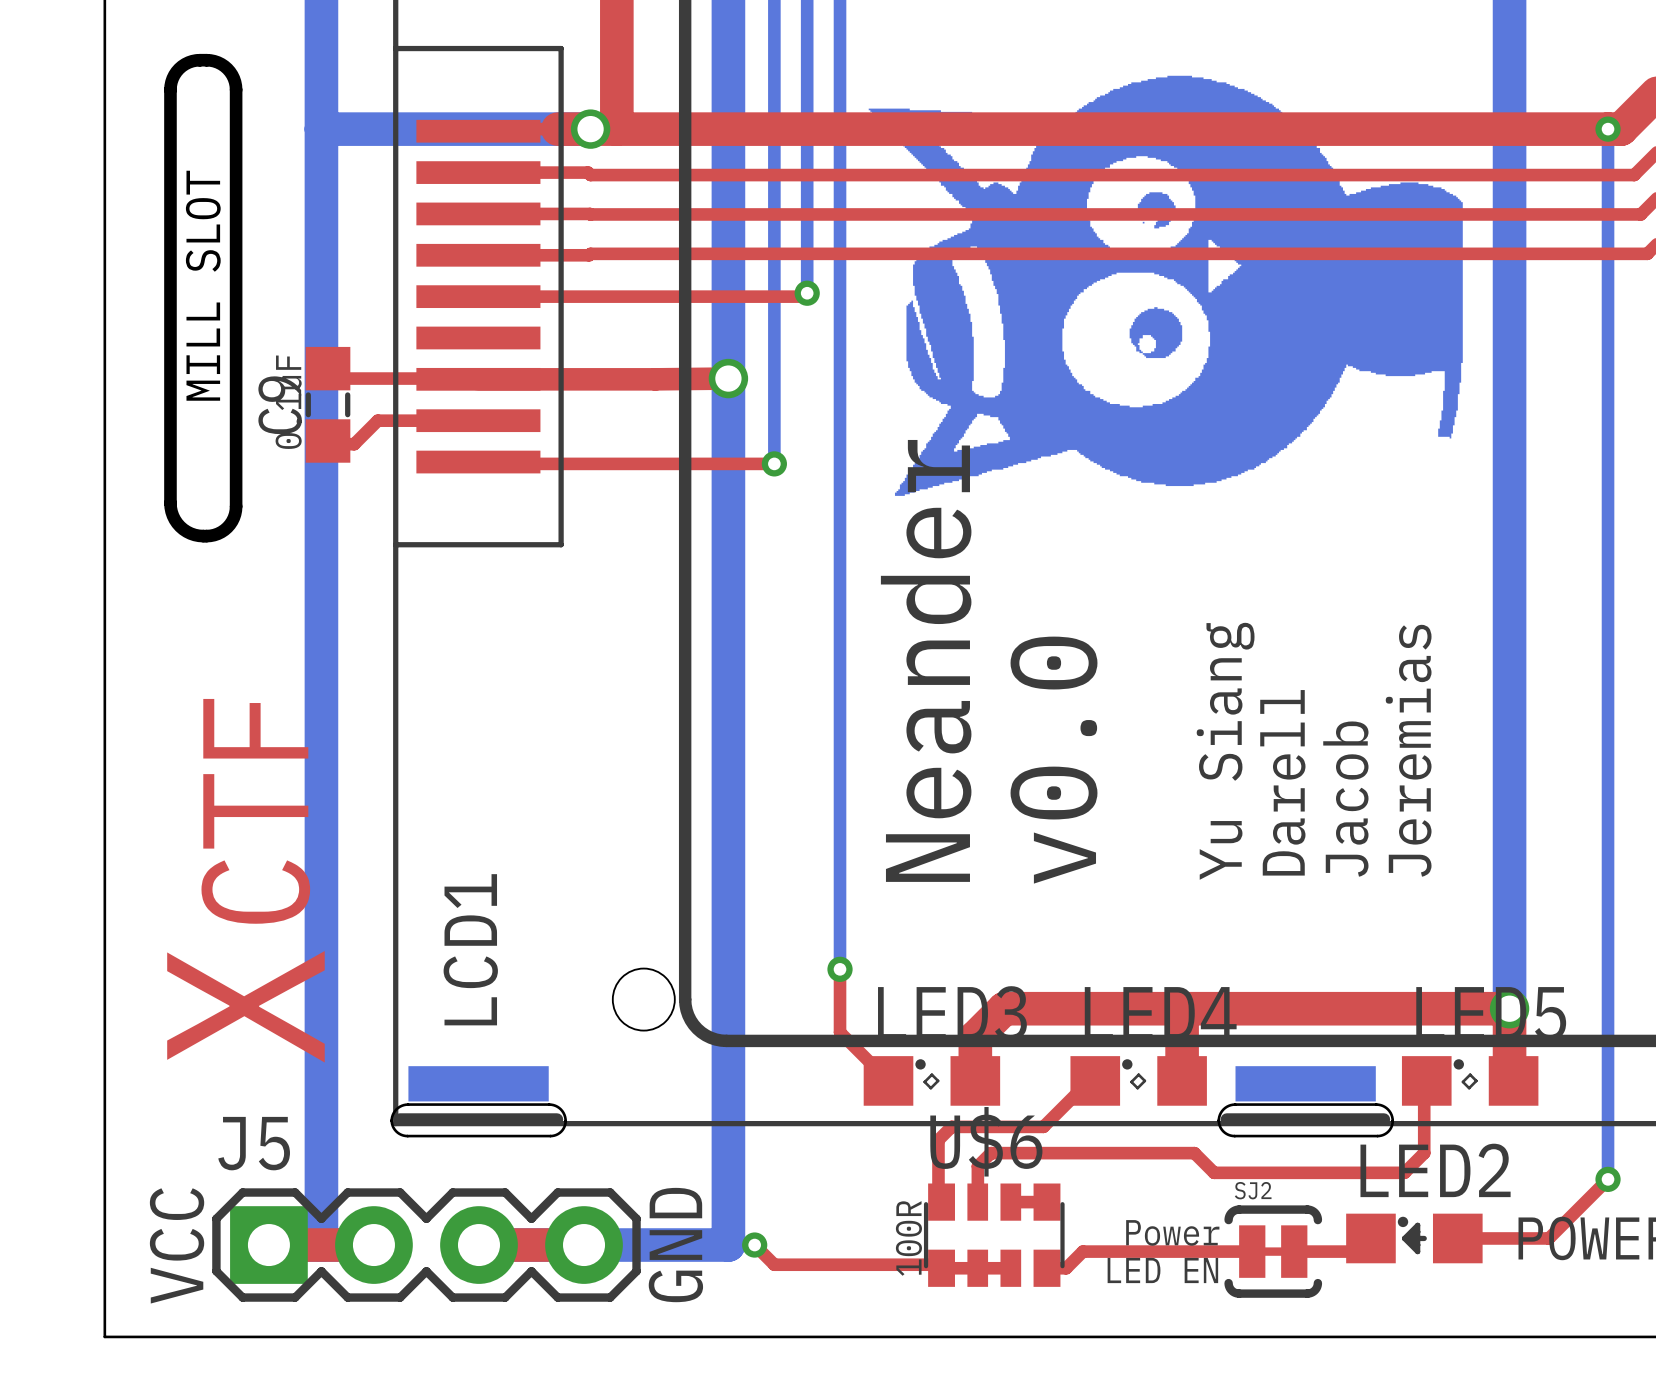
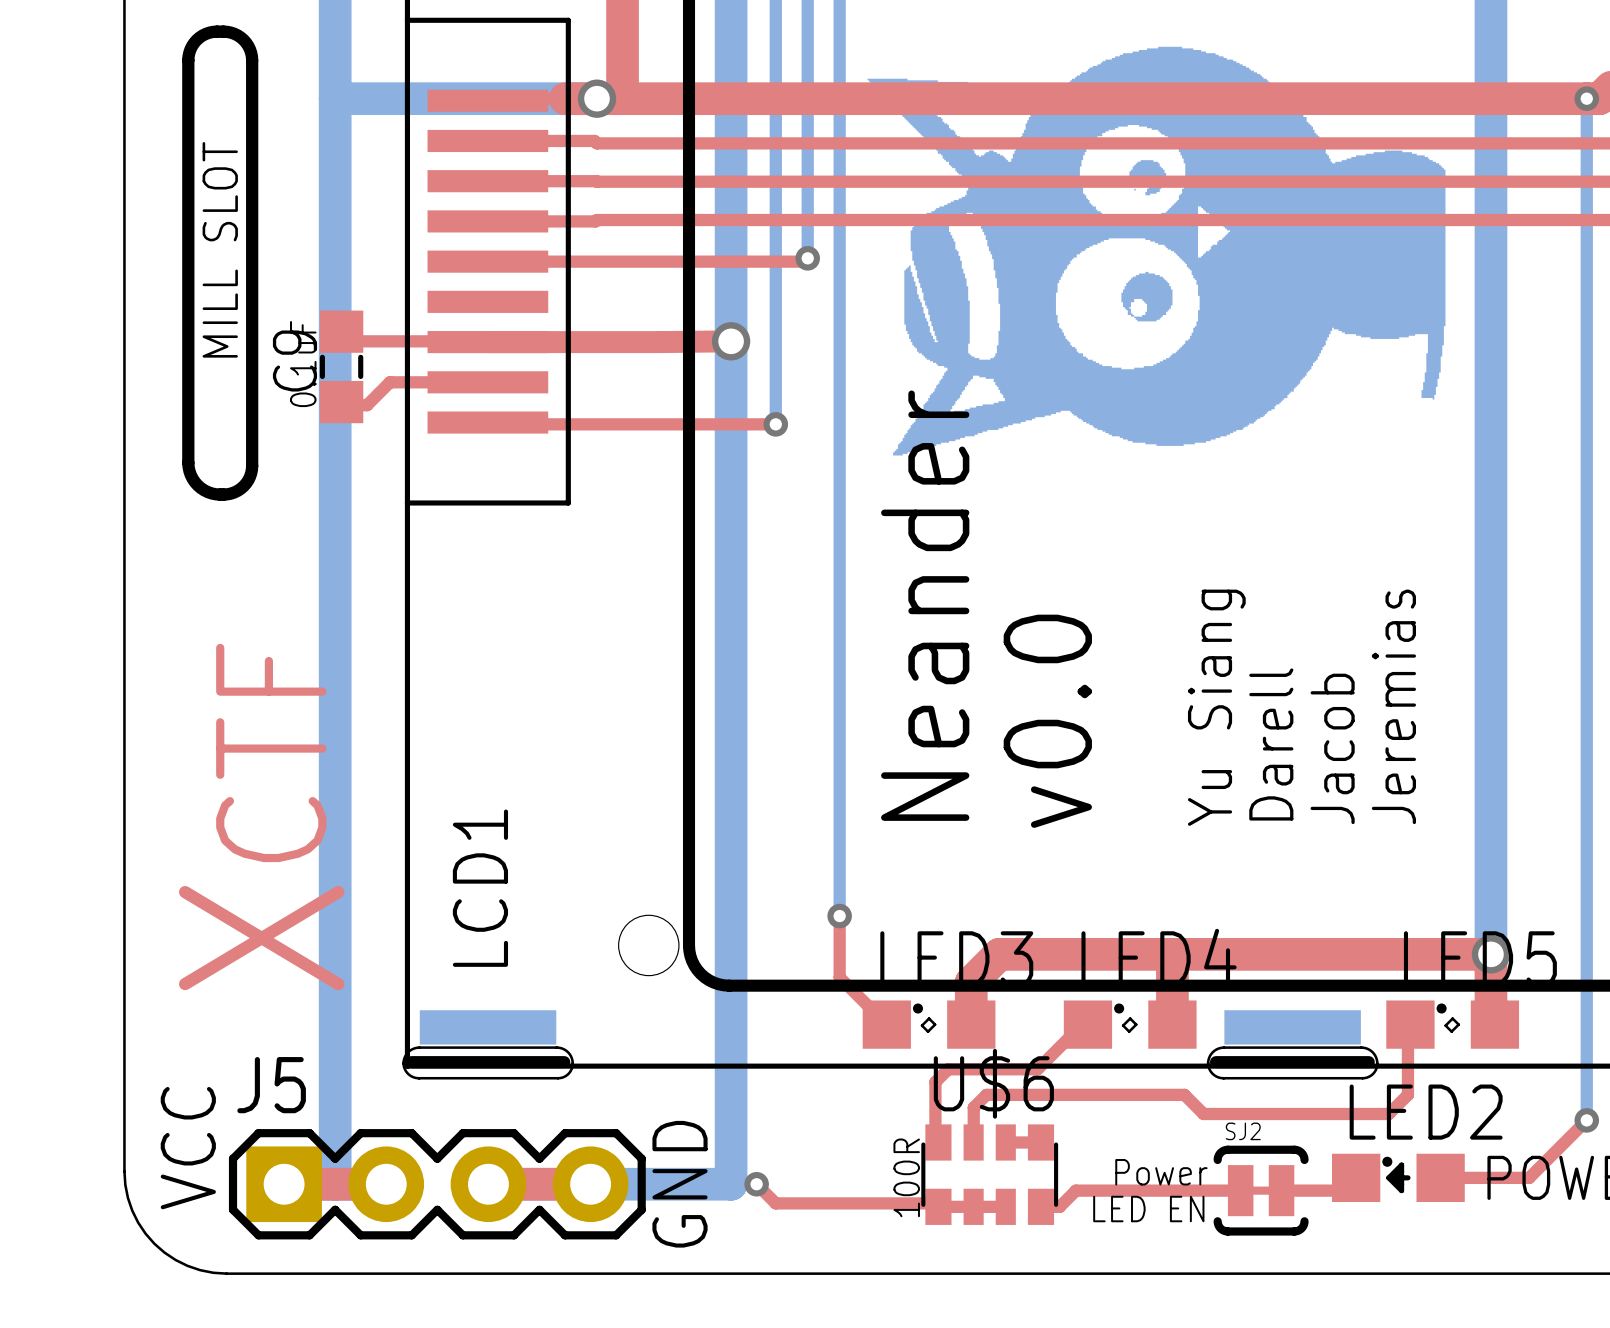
board edge: (104, 1231) (104, 1336) (209, 1336) -> (124, 1171) (127, 1197) (132, 1210) (145, 1233) (154, 1243) (164, 1252) (187, 1265) (200, 1270) (226, 1273)
text position: VCC (177, 1245) -> VCC (188, 1148)

